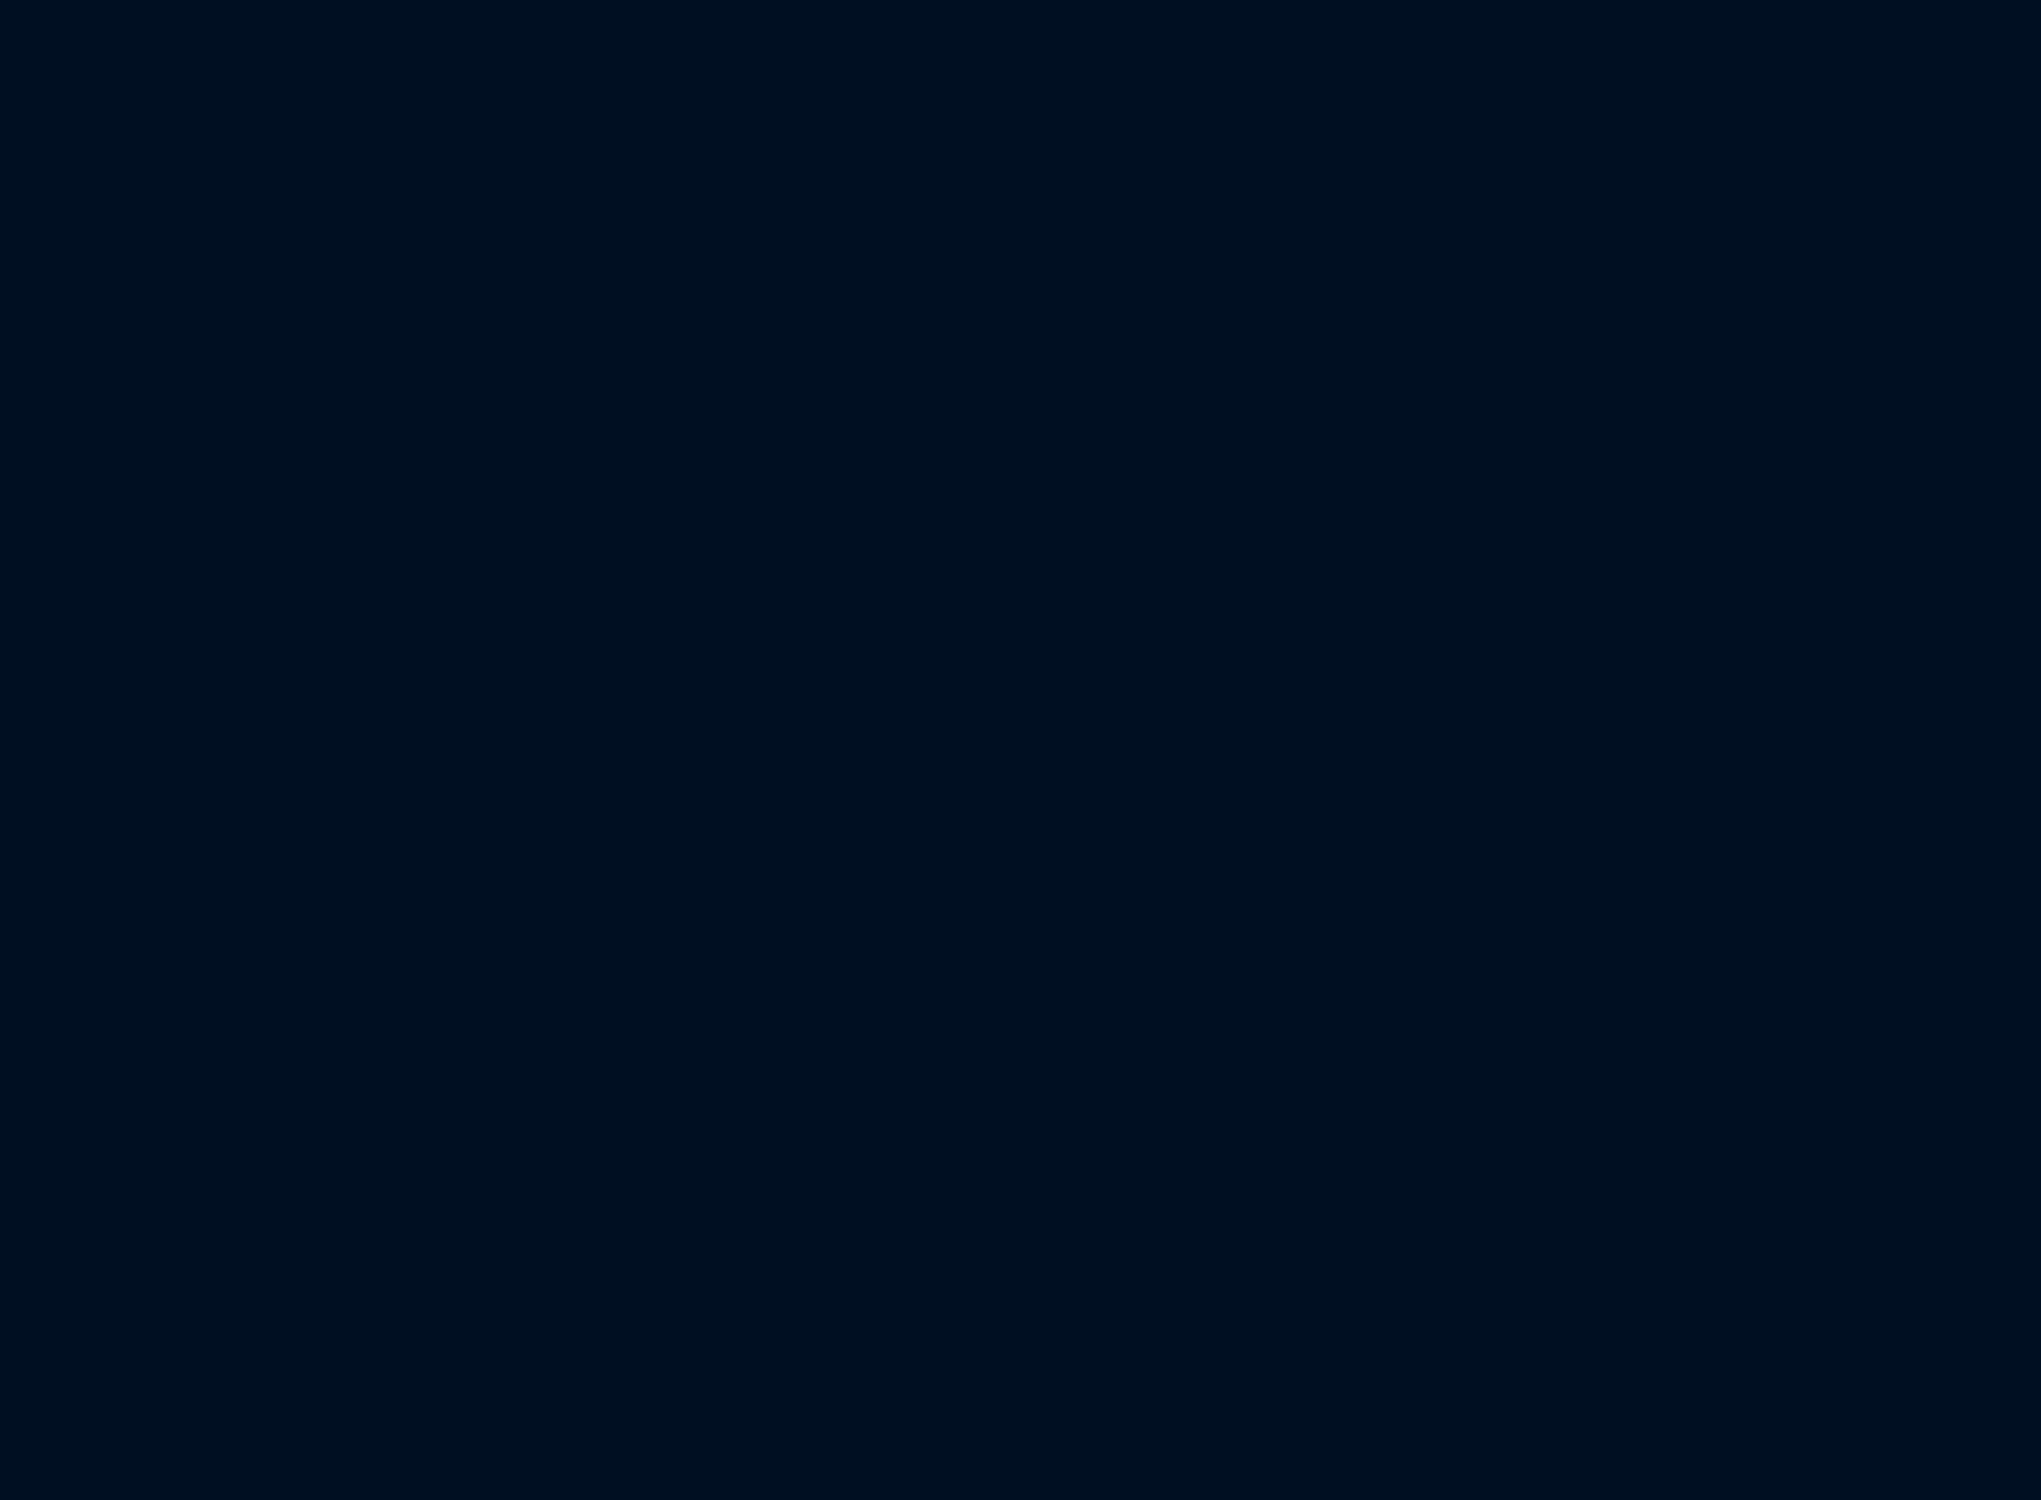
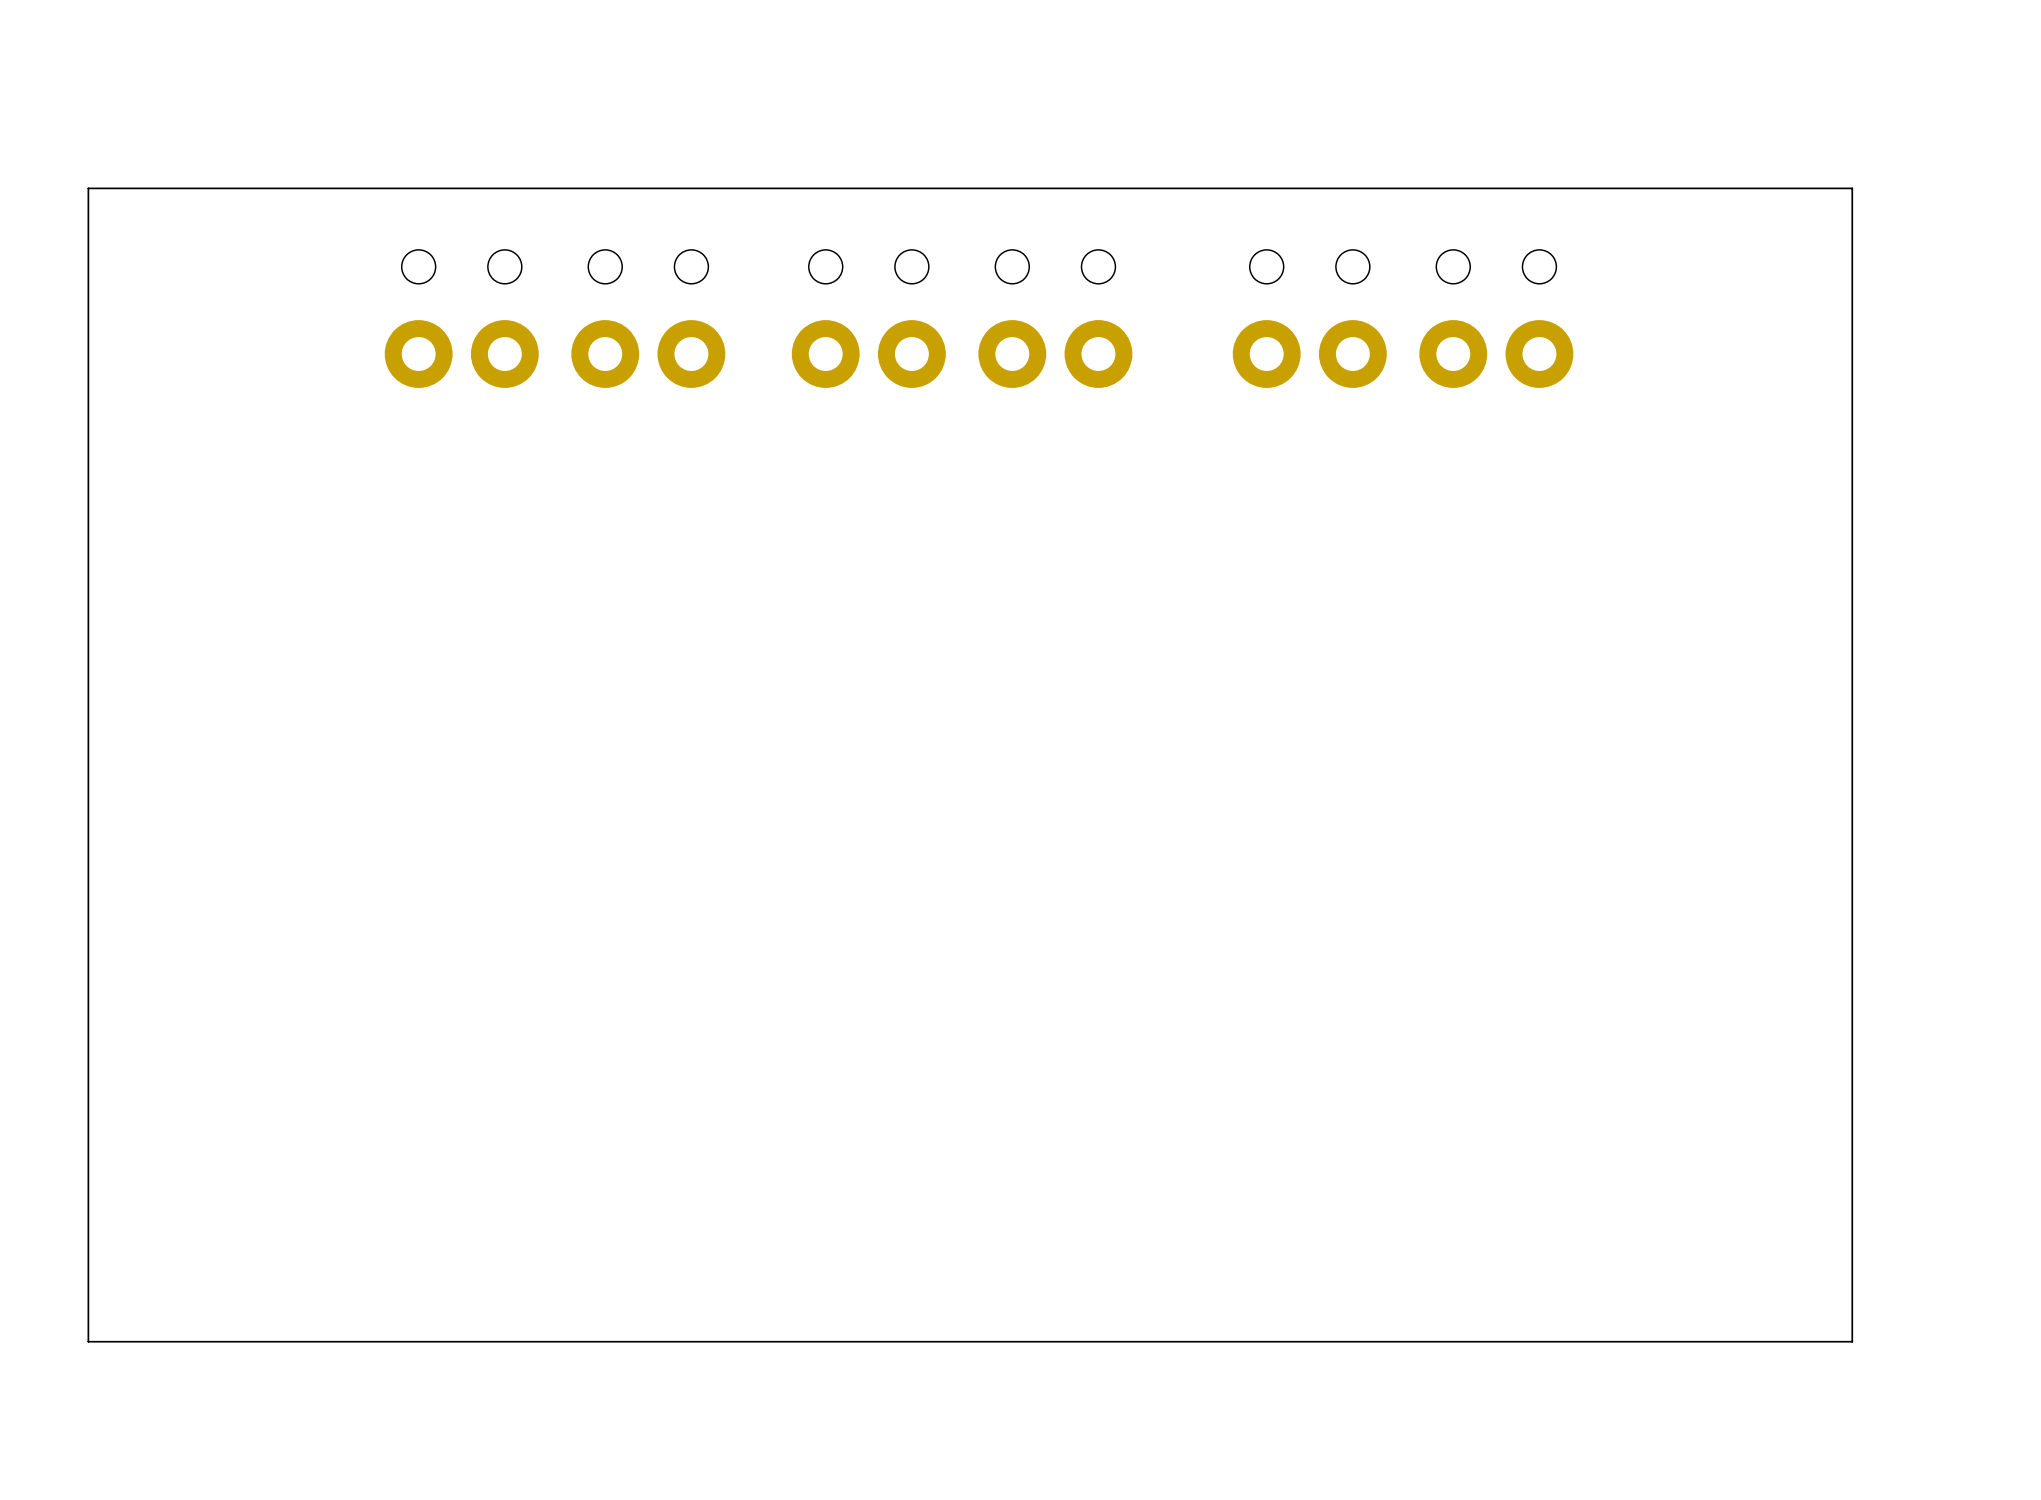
board edge: none -> (1852, 188) (88, 188) (88, 1341) (1852, 1341) (1852, 188)
part: none -> (461, 318)
part: none -> (648, 318)
part: none -> (868, 318)
part: none -> (1055, 318)
part: none -> (1309, 318)
part: none -> (1496, 318)

